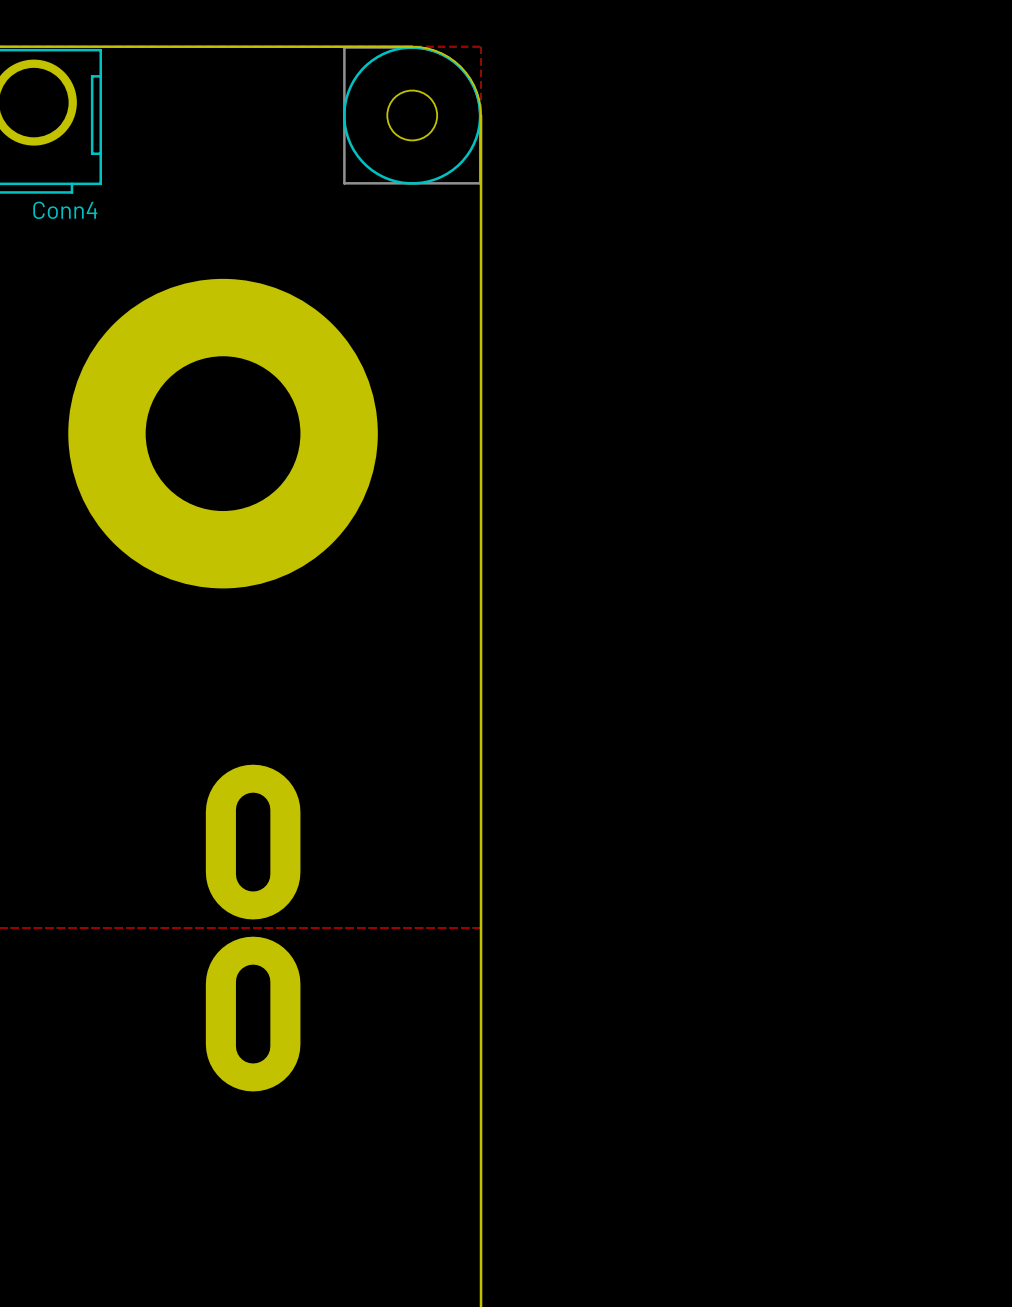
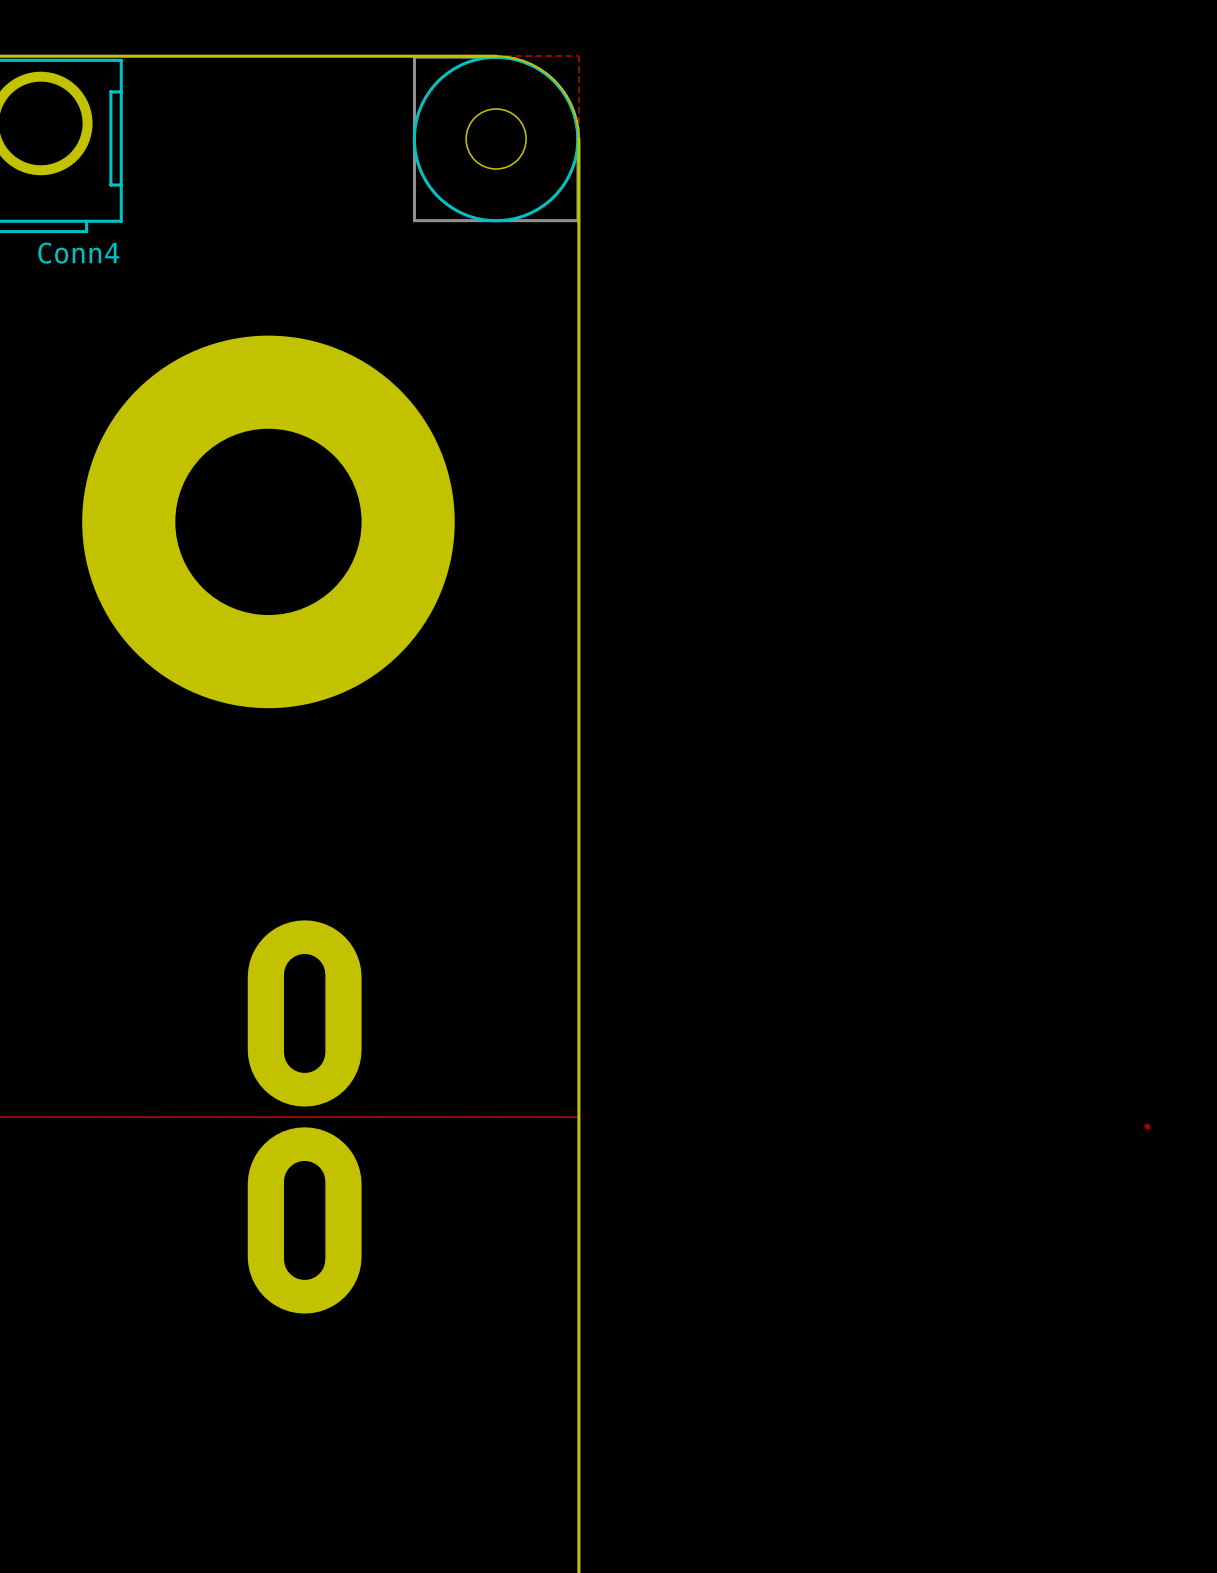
top track: none -> (1147, 1126) (1148, 1127)

